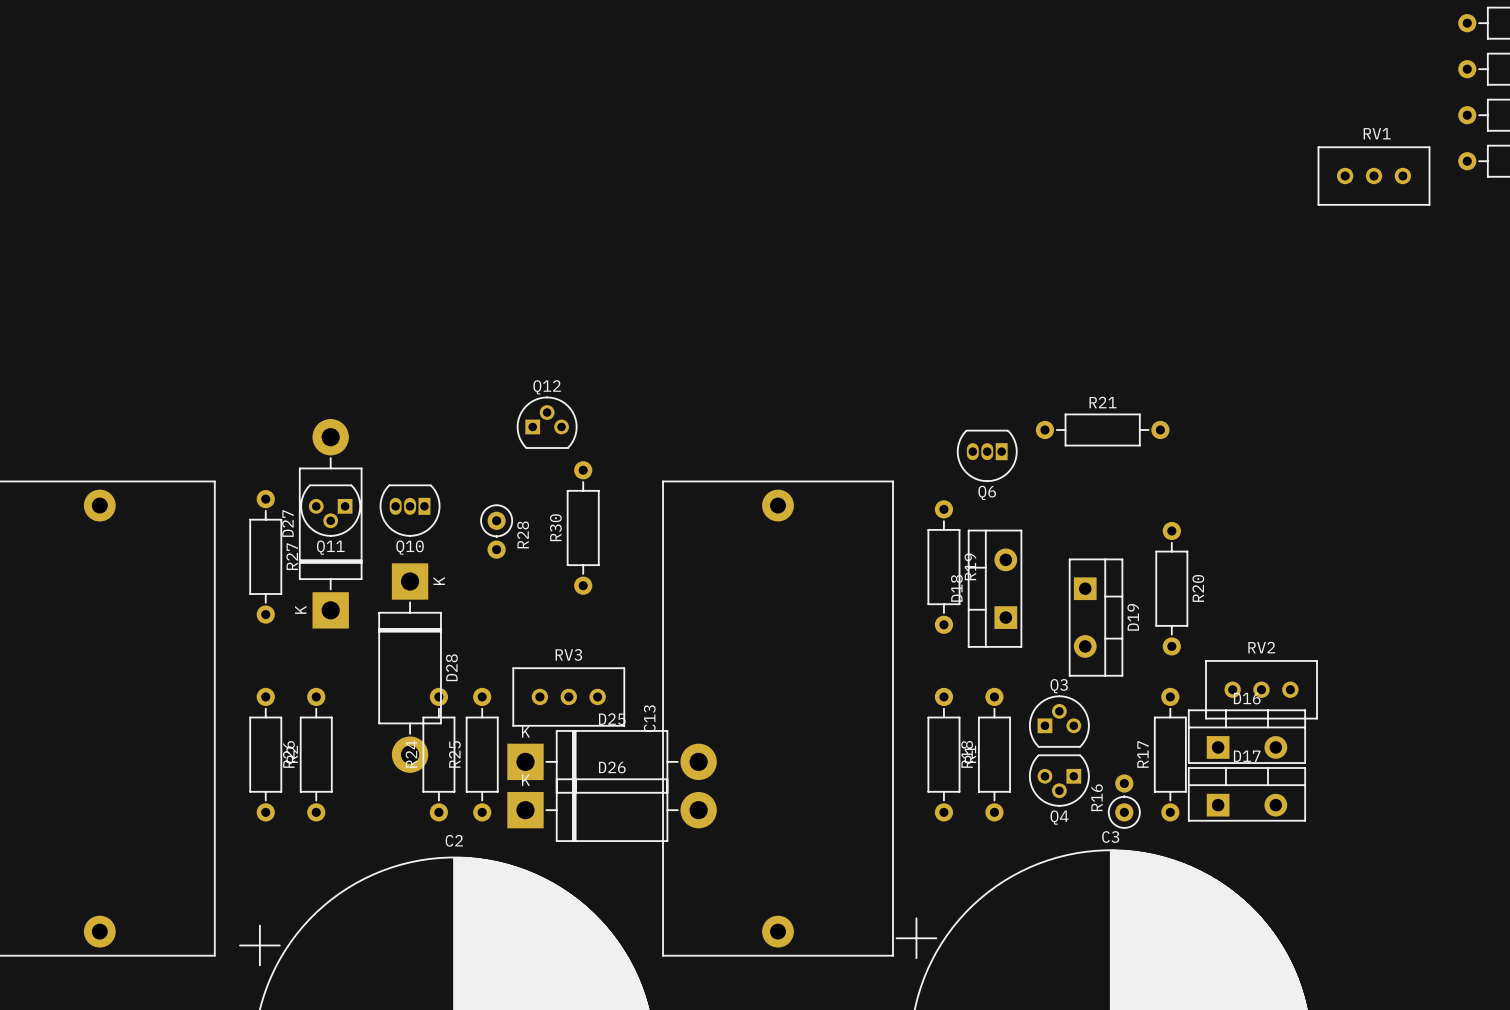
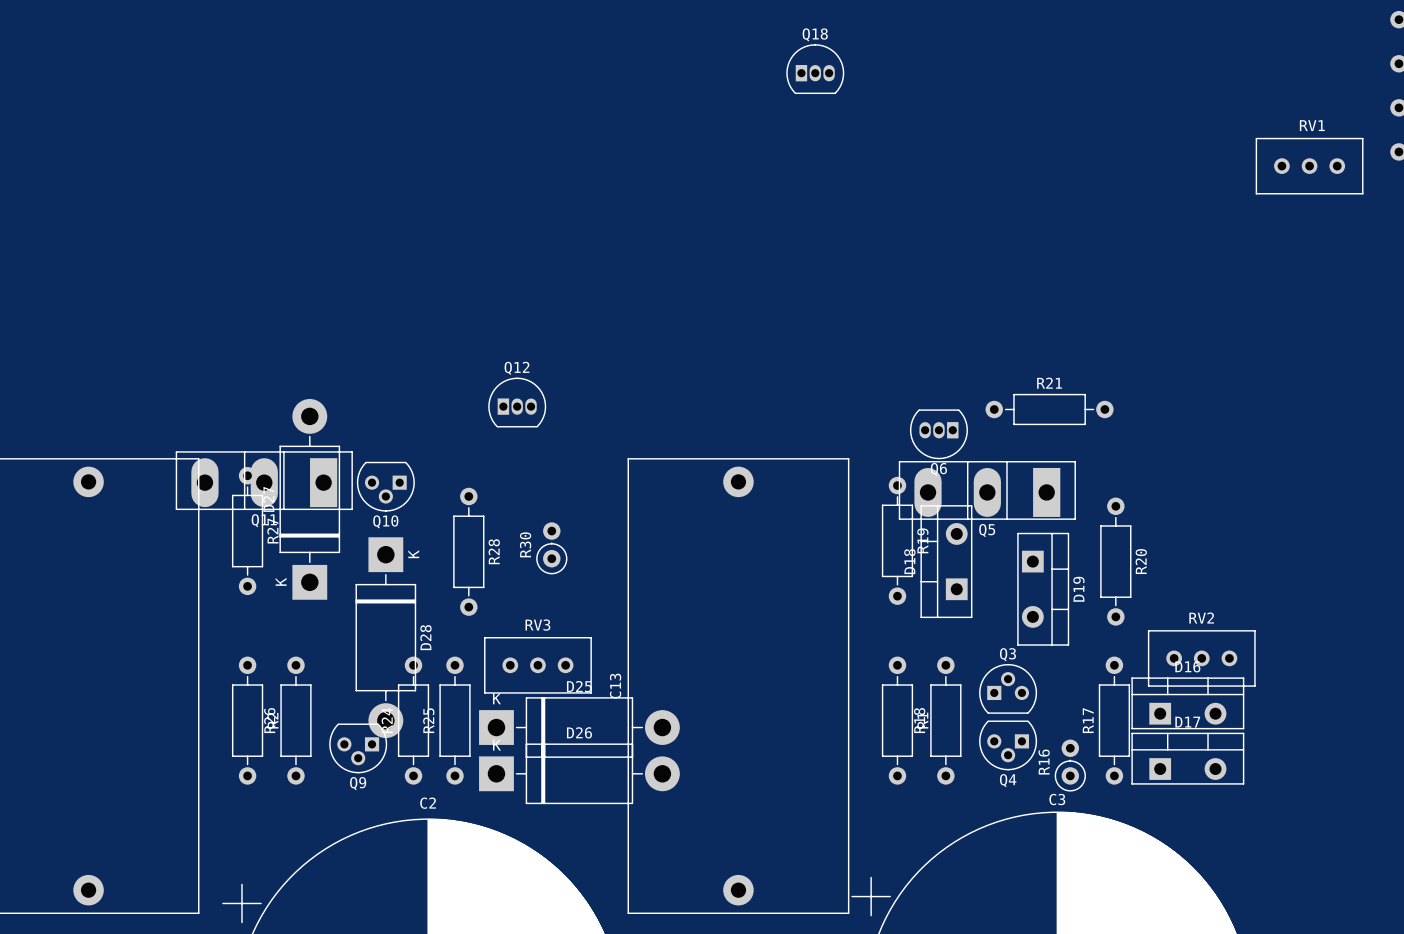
Q18: none -> (815, 69)
Q12 footprint: [516, 396, 578, 449] -> [488, 377, 547, 428]
R30 footprint: [566, 461, 600, 595] -> [536, 522, 568, 575]
Q11 footprint: [300, 484, 361, 537] -> [175, 451, 353, 511]
Q10 footprint: [379, 484, 441, 537] -> [356, 461, 415, 512]
R28 footprint: [480, 504, 513, 559] -> [453, 487, 485, 616]
Q5: none -> (987, 490)
Q9: none -> (358, 748)

